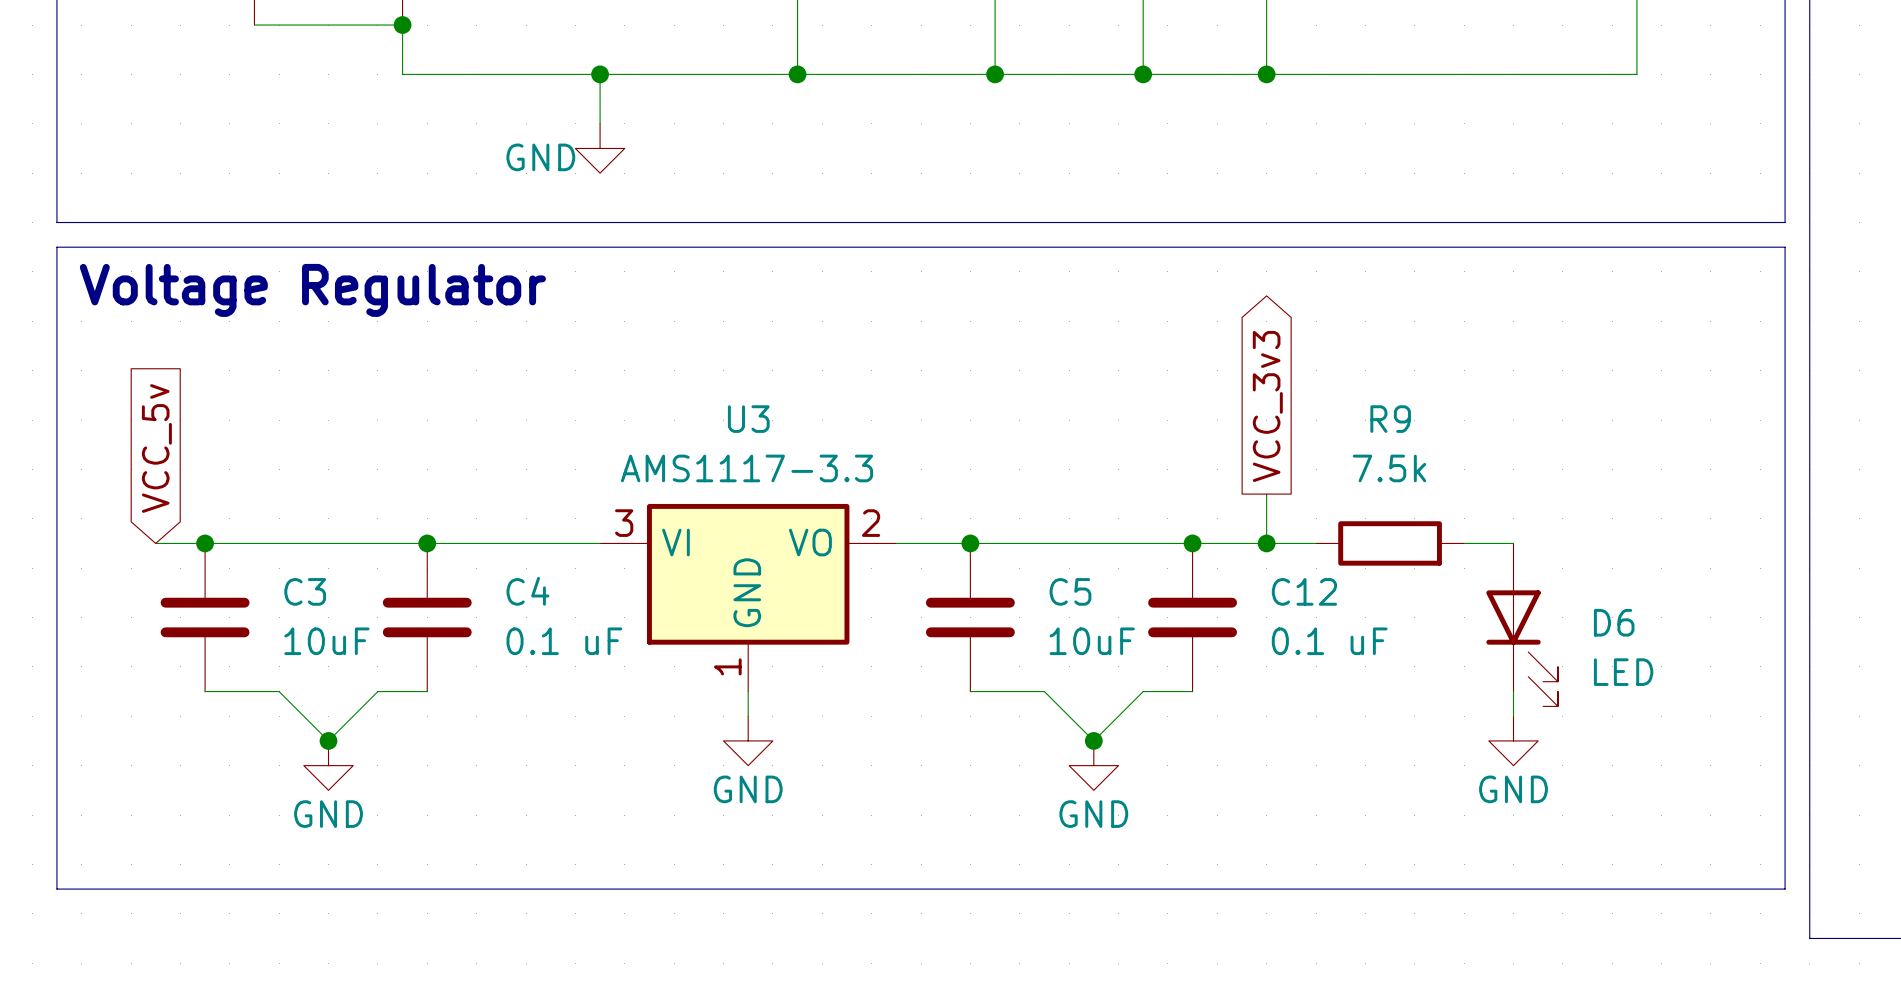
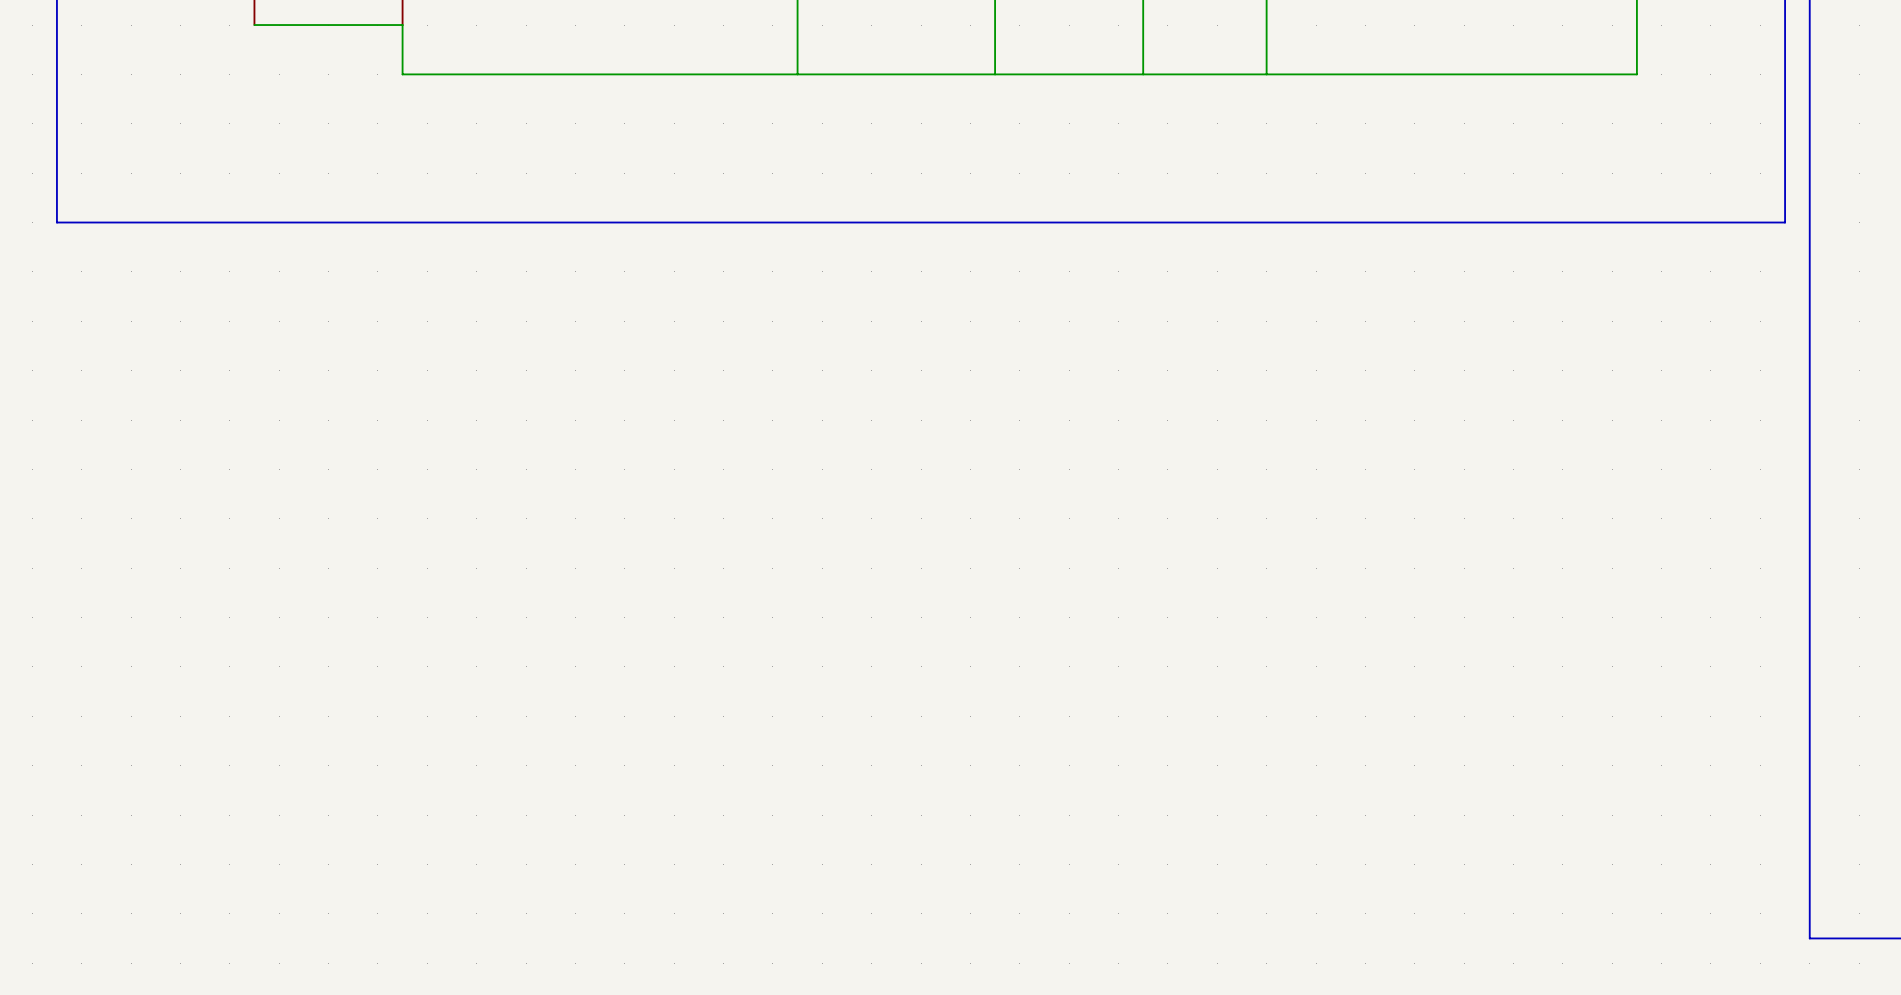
junction: (402, 25) -> none
wire: (600, 74) (600, 123) -> none
junction: (600, 74) -> none
junction: (797, 74) -> none
junction: (995, 74) -> none
junction: (1143, 74) -> none
junction: (1266, 74) -> none
power symbol: GND (600, 148) -> none
line: (56, 247) (1785, 247) (1785, 889) (56, 889) (56, 247) -> none
text: Voltage Regulator (312, 290) -> none
global label: VCC_3v3 (1267, 406) -> none
global label: VCC_5v (156, 448) -> none
wire: (1266, 494) (1266, 543) -> none
wire: (155, 543) (600, 543) -> none
junction: (205, 543) -> none
junction: (427, 543) -> none
wire: (896, 543) (1316, 543) -> none
junction: (970, 543) -> none
junction: (1192, 543) -> none
junction: (1266, 543) -> none
R9: 7.5k (1390, 543) -> none
wire: (1464, 543) (1513, 543) -> none
U3: AMS1117-3.3 (748, 597) -> none
C3: 10uF (205, 617) -> none
C4: 0.1 uF (427, 617) -> none
C5: 10uF (970, 617) -> none
C12: 0.1 uF (1192, 617) -> none
D6: LED (1522, 624) -> none
wire: (205, 691) (279, 691) (328, 740) (377, 691) (427, 691) -> none
wire: (748, 691) (748, 716) -> none
wire: (970, 691) (1044, 691) (1093, 740) (1143, 691) (1192, 691) -> none
wire: (1513, 691) (1513, 716) -> none
junction: (328, 740) -> none
power symbol: GND (748, 740) -> none
junction: (1093, 740) -> none
power symbol: GND (1513, 740) -> none
power symbol: GND (328, 765) -> none
power symbol: GND (1093, 765) -> none

